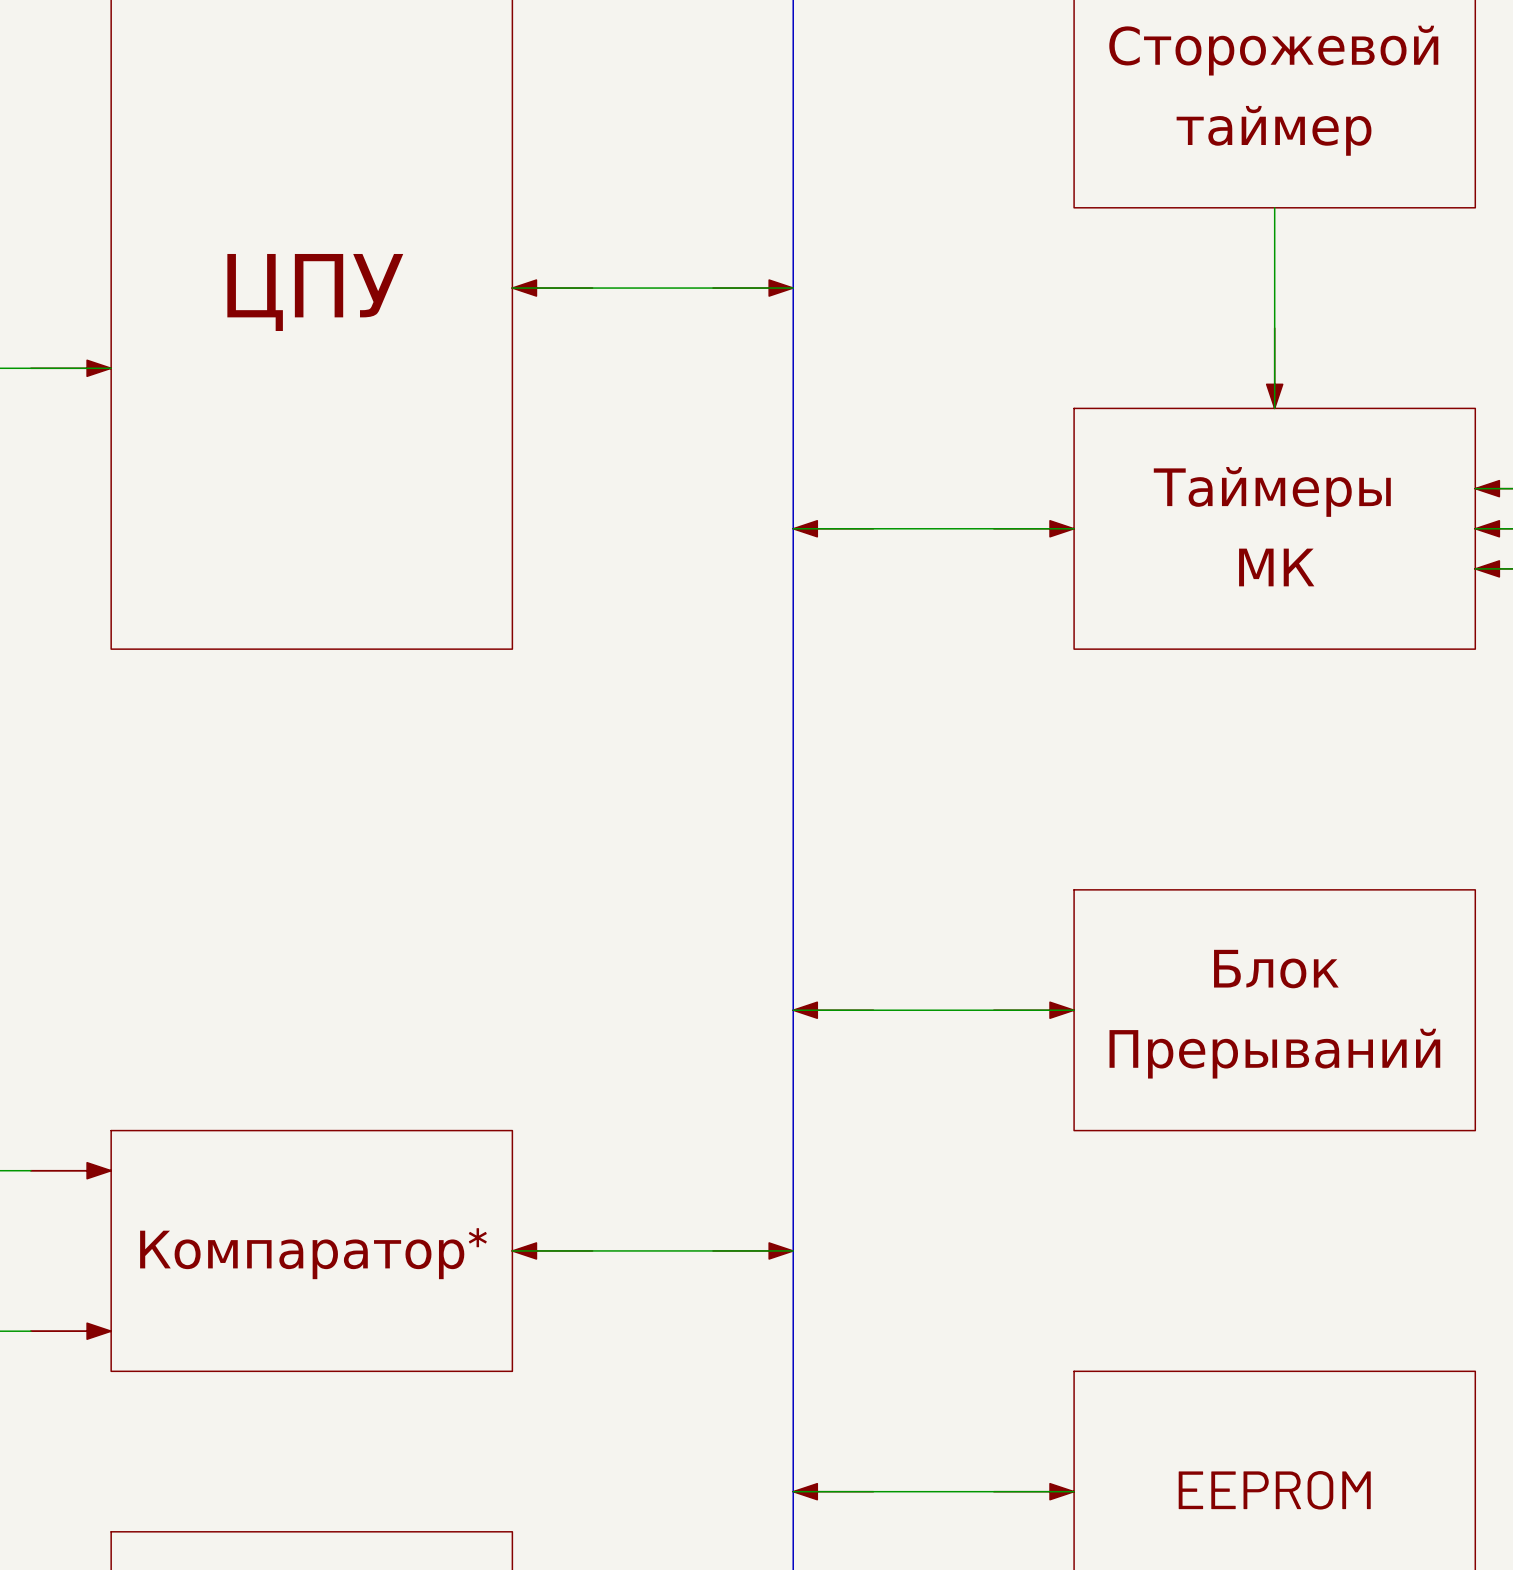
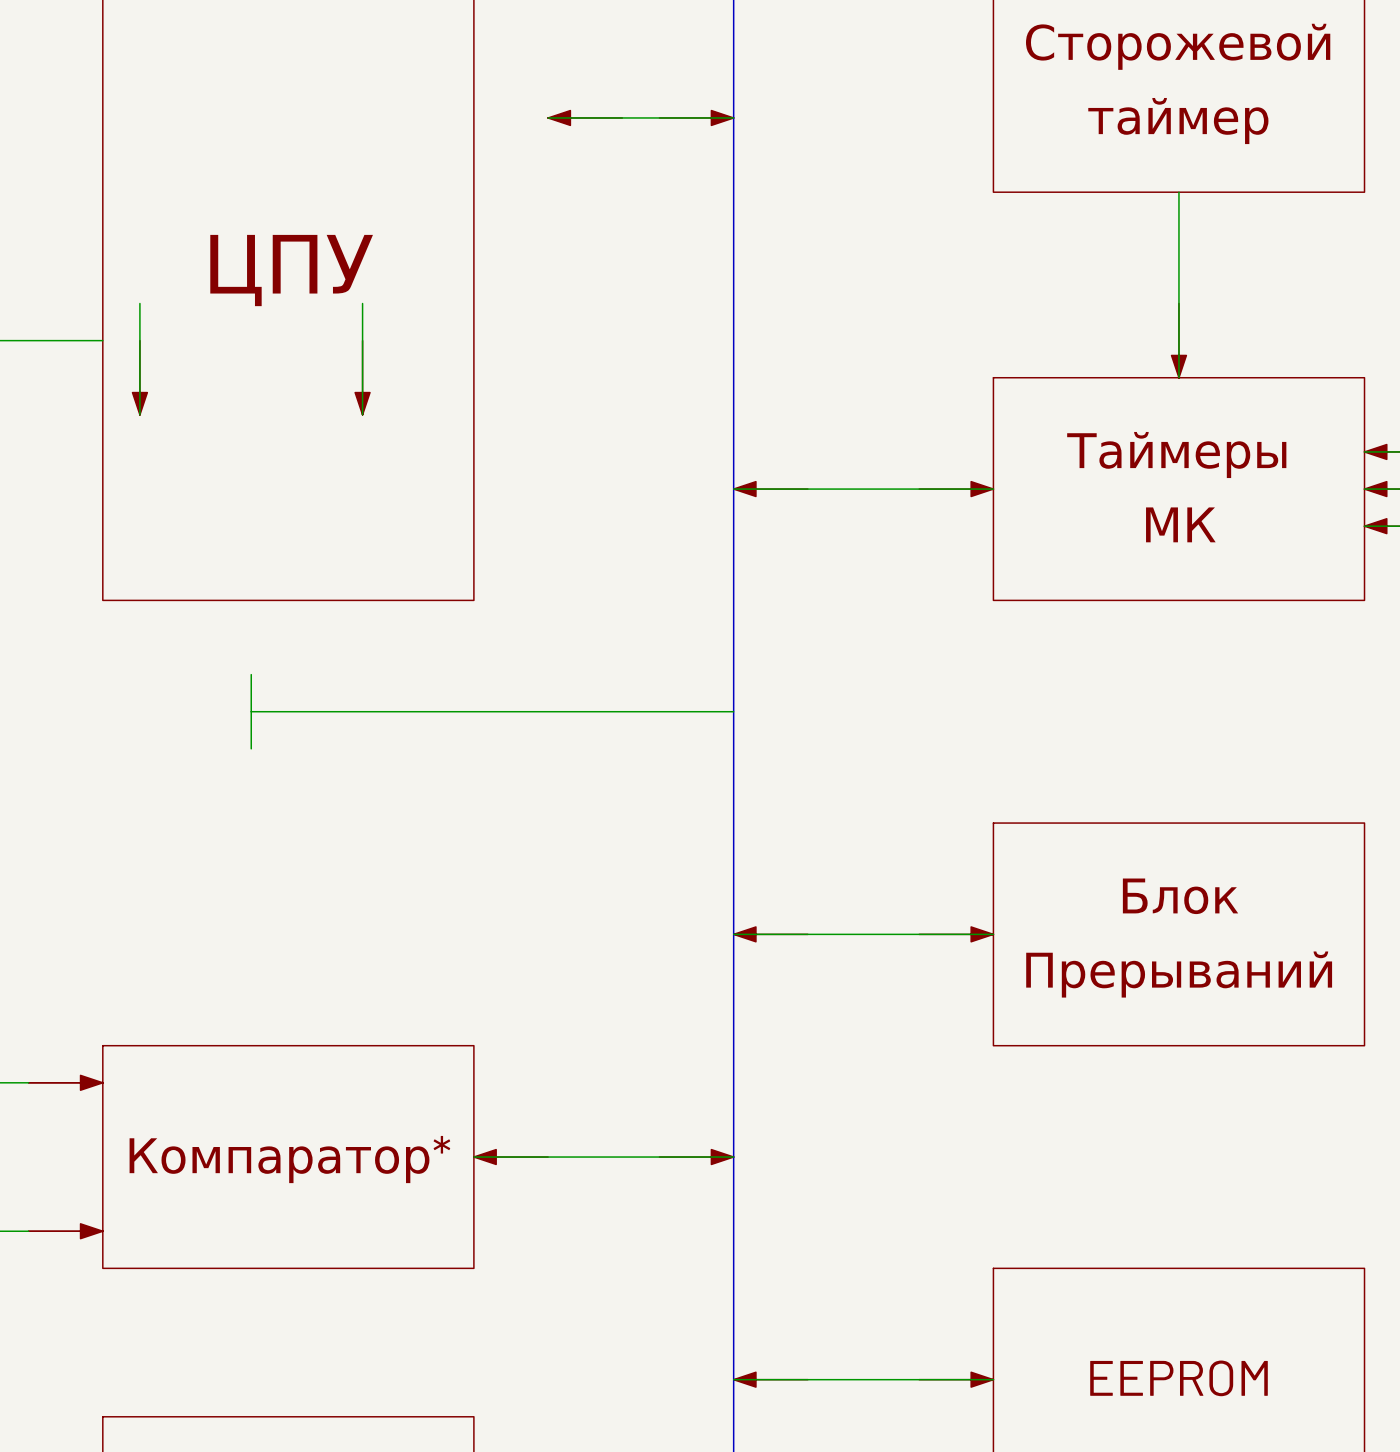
wire: none -> (548, 117) (733, 117)
power symbol: none -> (585, 117)
power symbol: none -> (696, 117)
wire: (512, 288) (793, 288) -> none
power symbol: (552, 288) -> none
power symbol: (753, 288) -> none
wire: none -> (139, 303) (139, 414)
wire: none -> (362, 303) (362, 414)
power symbol rotation: 0° (71, 368) -> 90° clockwise (139, 377)
power symbol position: (71, 368) -> (139, 377)
power symbol: none -> (362, 377)
wire: none -> (251, 674) (251, 748)
wire: none -> (251, 711) (733, 711)

